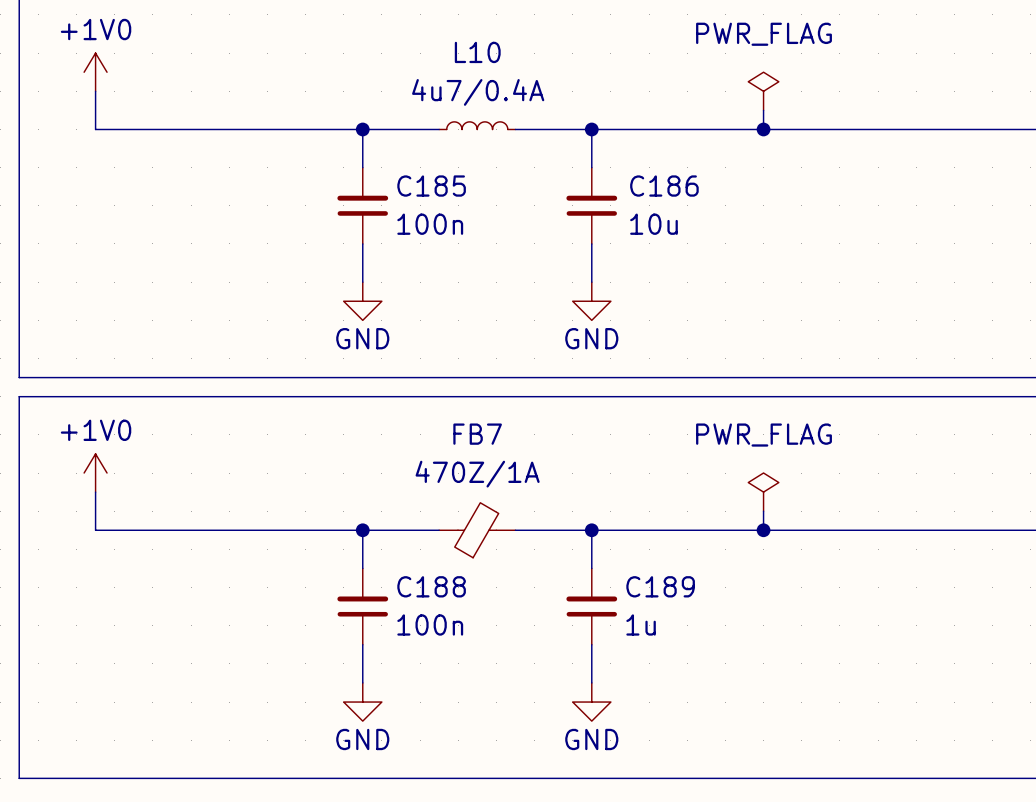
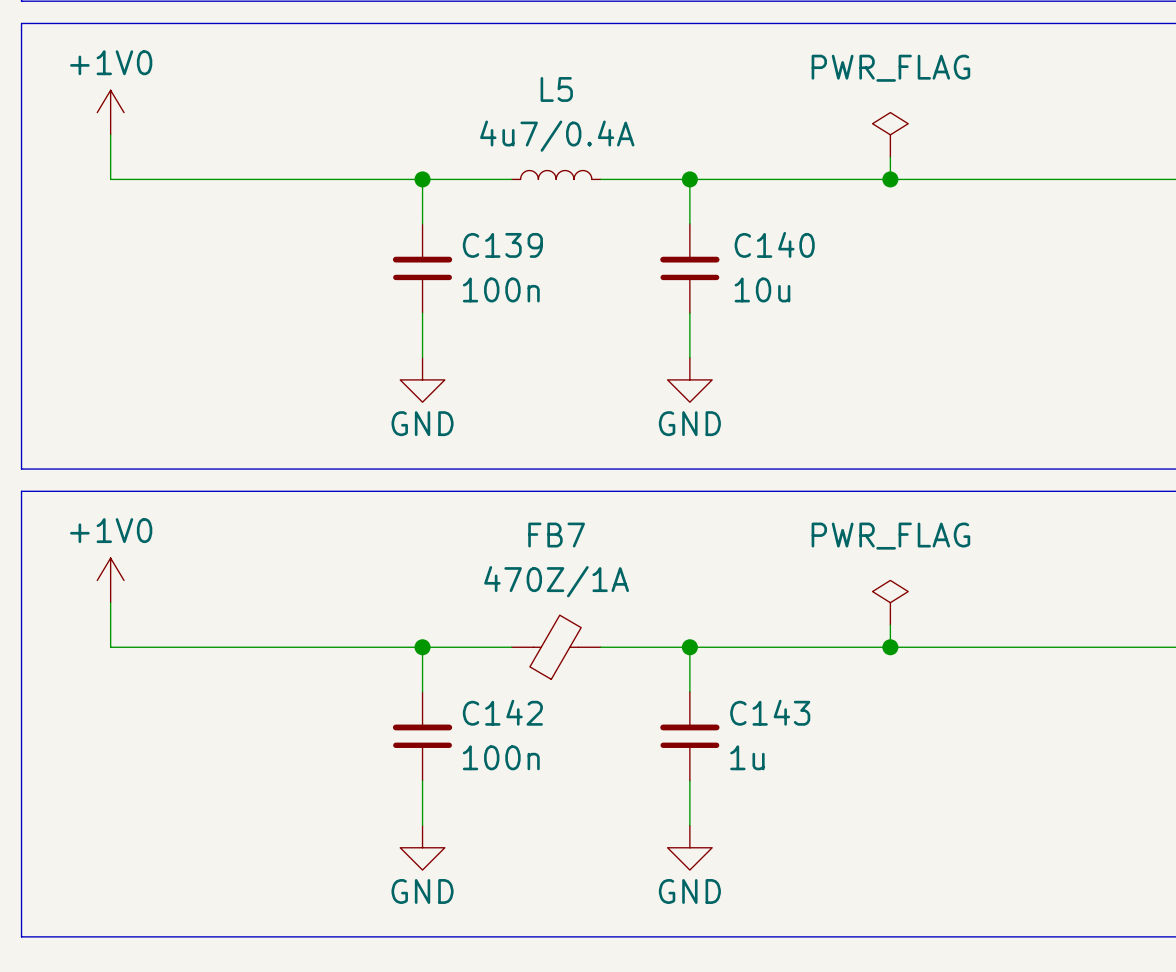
L10 name: L10 (477, 52) -> L5 (556, 89)
C185 name: C185 (431, 186) -> C139 (502, 245)
C186 name: C186 (664, 186) -> C140 (774, 244)
C188 name: C188 (431, 586) -> C142 (502, 712)
C189 name: C189 (660, 586) -> C143 (770, 712)

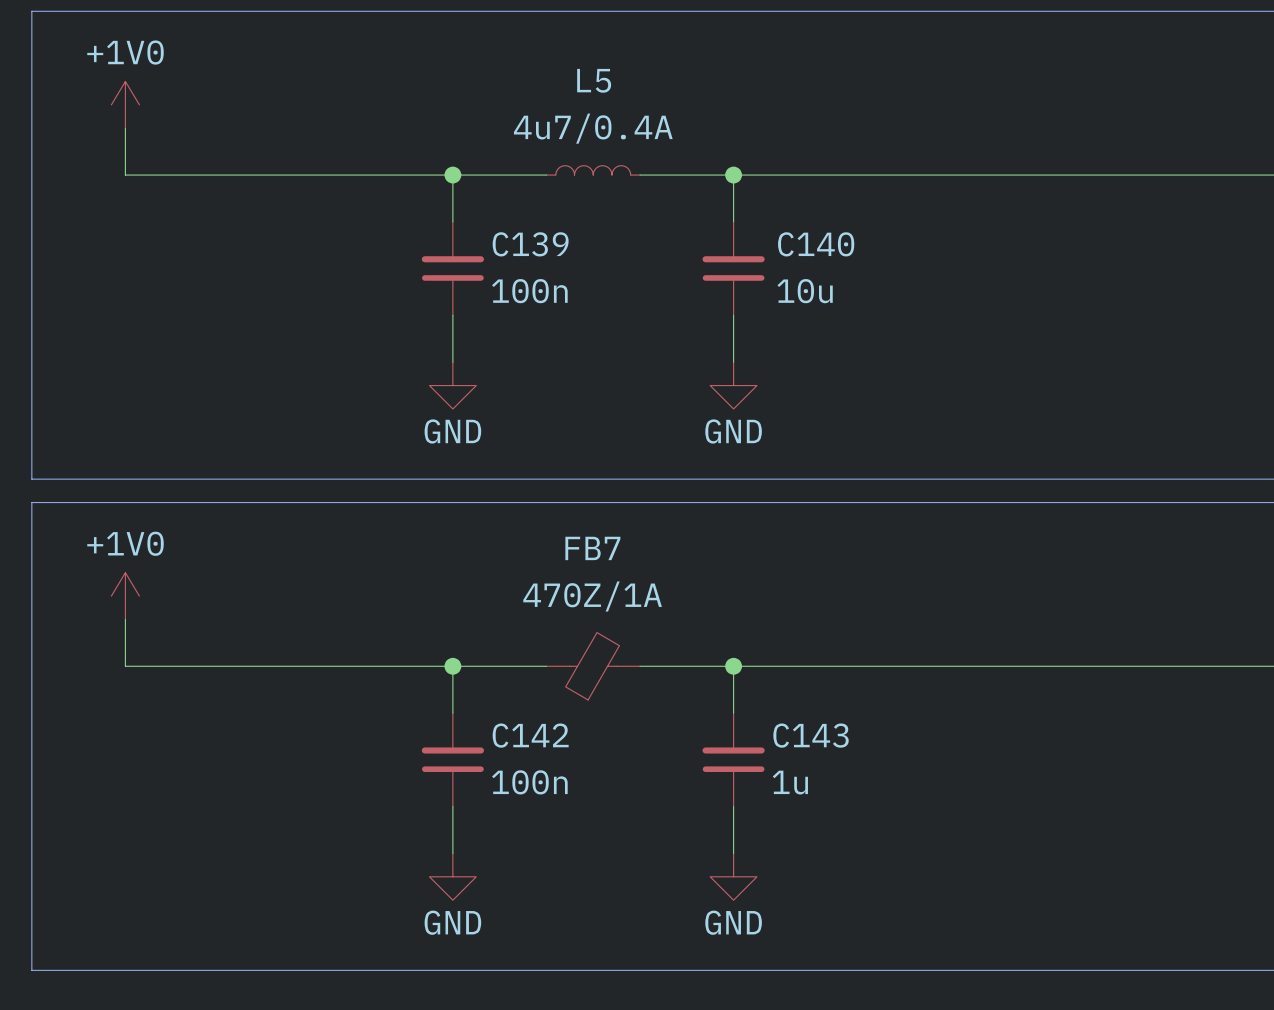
power symbol: PWR_FLAG (890, 134) -> none
wire: (890, 157) (890, 179) -> none
junction: (890, 179) -> none
power symbol: PWR_FLAG (890, 602) -> none
wire: (890, 624) (890, 647) -> none
junction: (890, 647) -> none

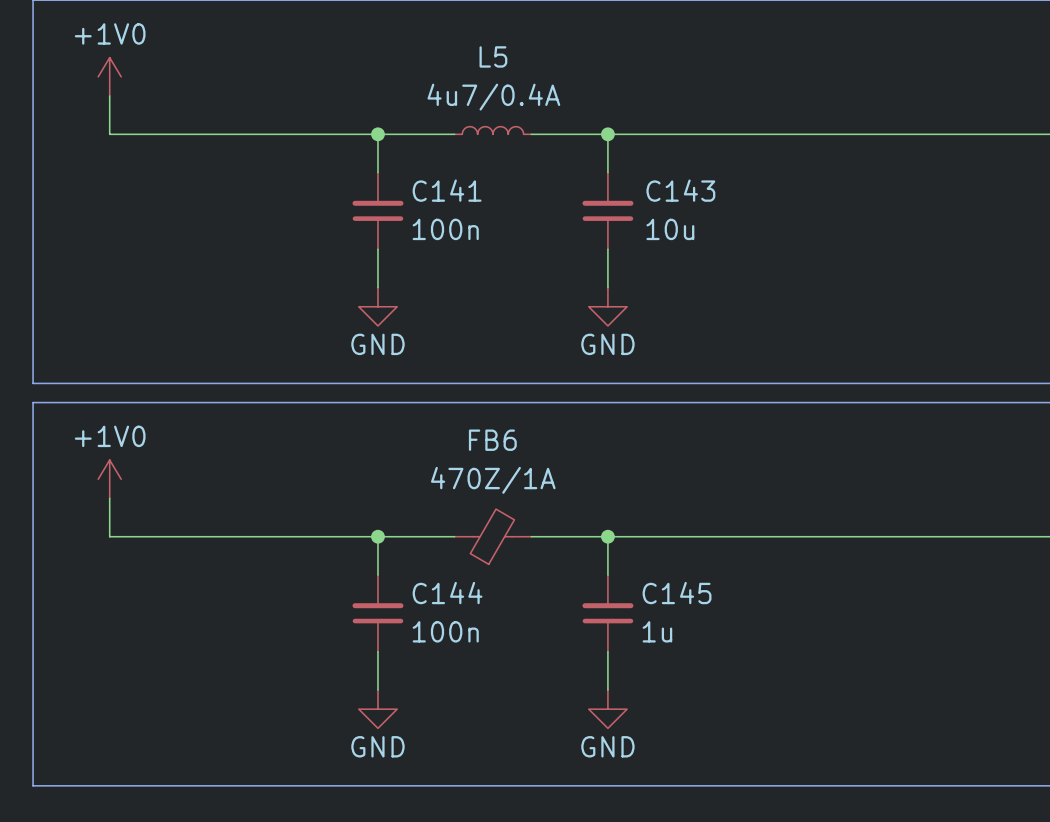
C139 name: C139 (530, 244) -> C141 (447, 190)
C140 name: C140 (816, 244) -> C143 (680, 190)
FB7 name: FB7 (592, 548) -> FB6 (492, 440)
C142 name: C142 (530, 735) -> C144 (447, 593)
C143 name: C143 (811, 735) -> C145 (677, 593)

